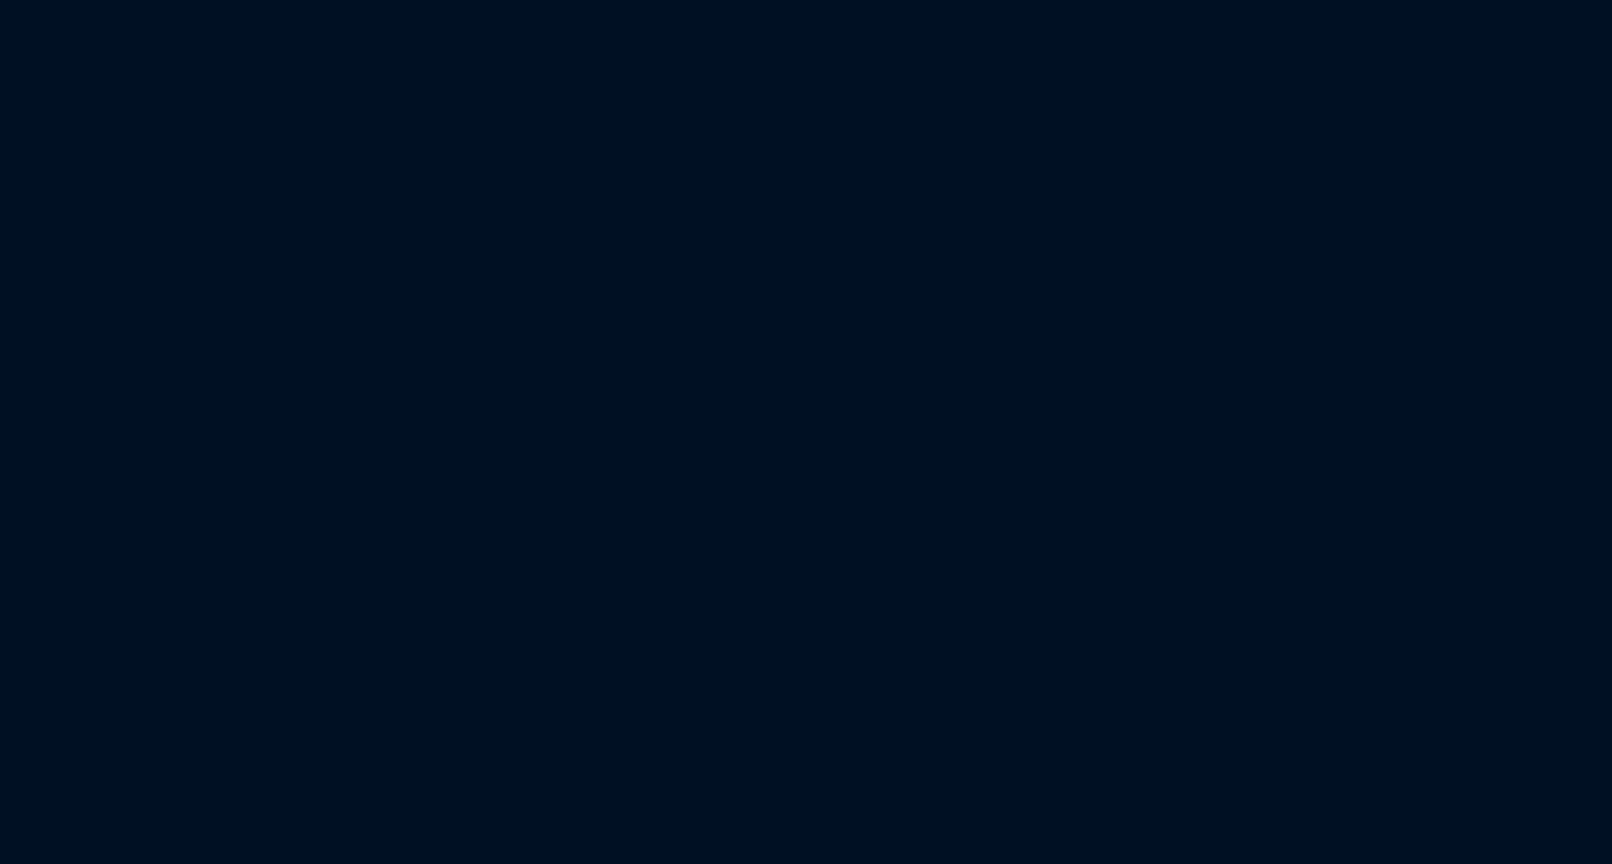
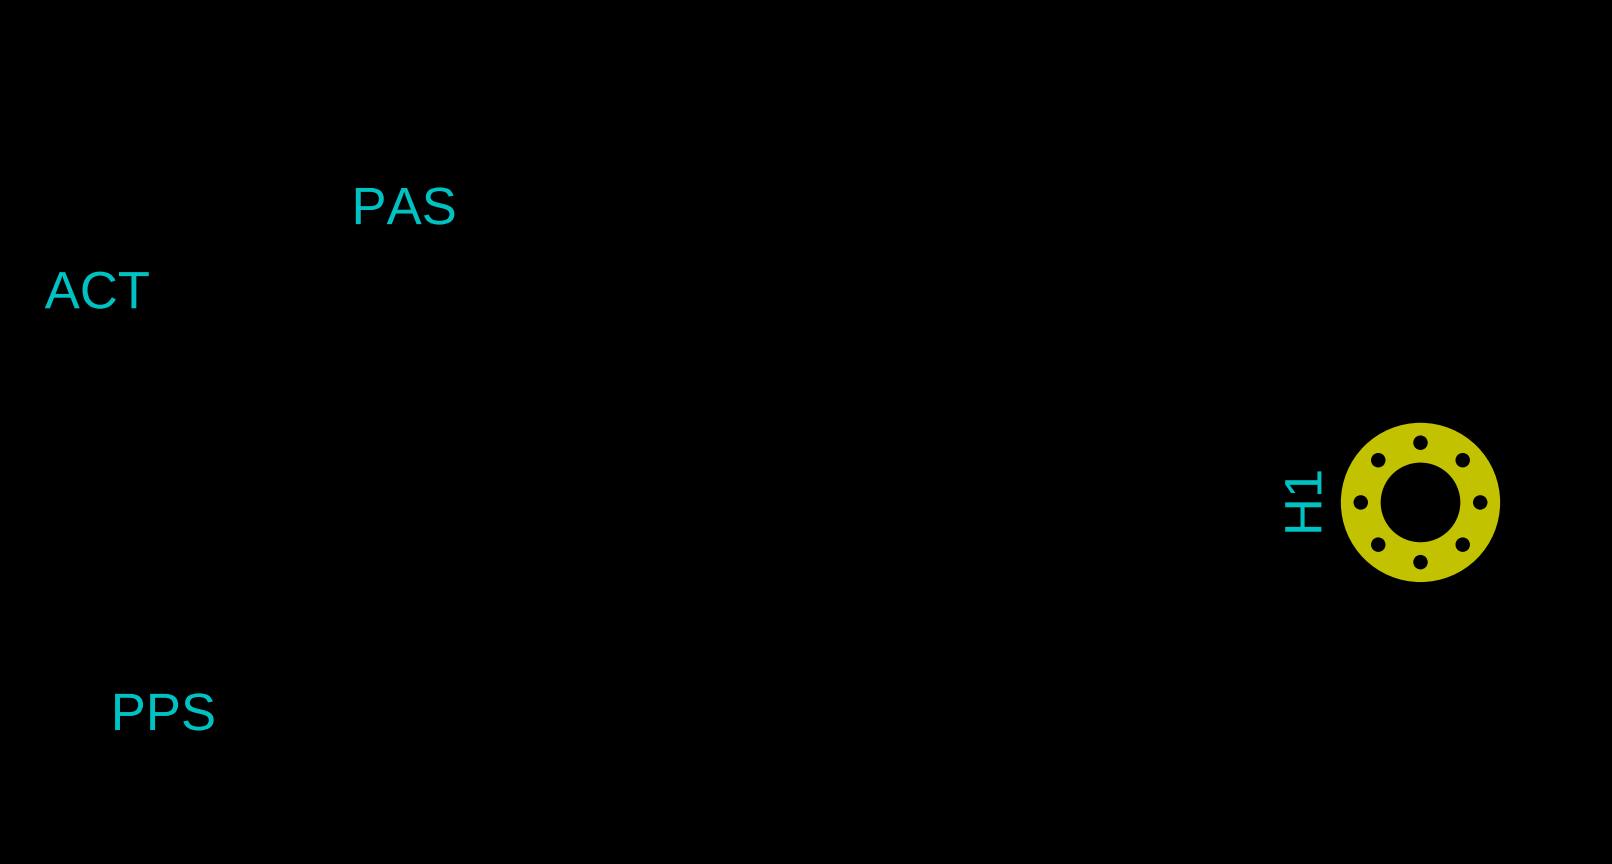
text: none -> PAS (405, 206)
text: none -> ACT (96, 290)
H1: none -> (1420, 502)
text: none -> PPS (164, 711)

